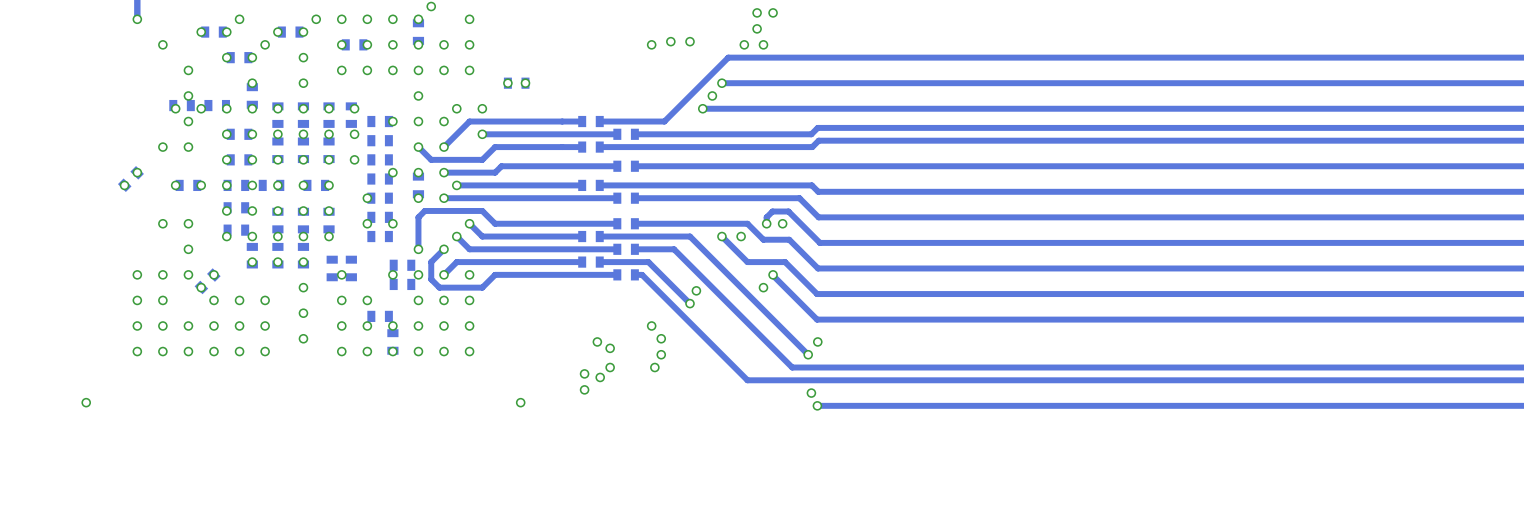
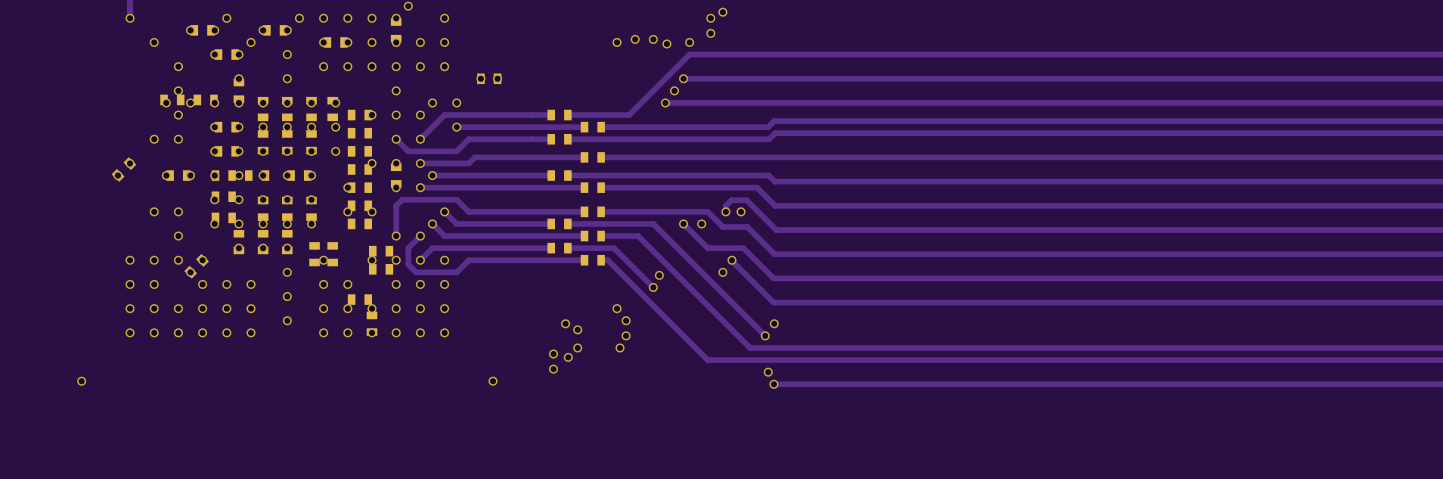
via: (757, 12) -> none
via: none -> (722, 12)
via: (773, 12) -> none
via: none -> (710, 18)
via: (757, 28) -> none
via: none -> (710, 33)
via: none -> (689, 42)
via: (744, 44) -> none
via: (763, 44) -> none
via: none -> (666, 43)

